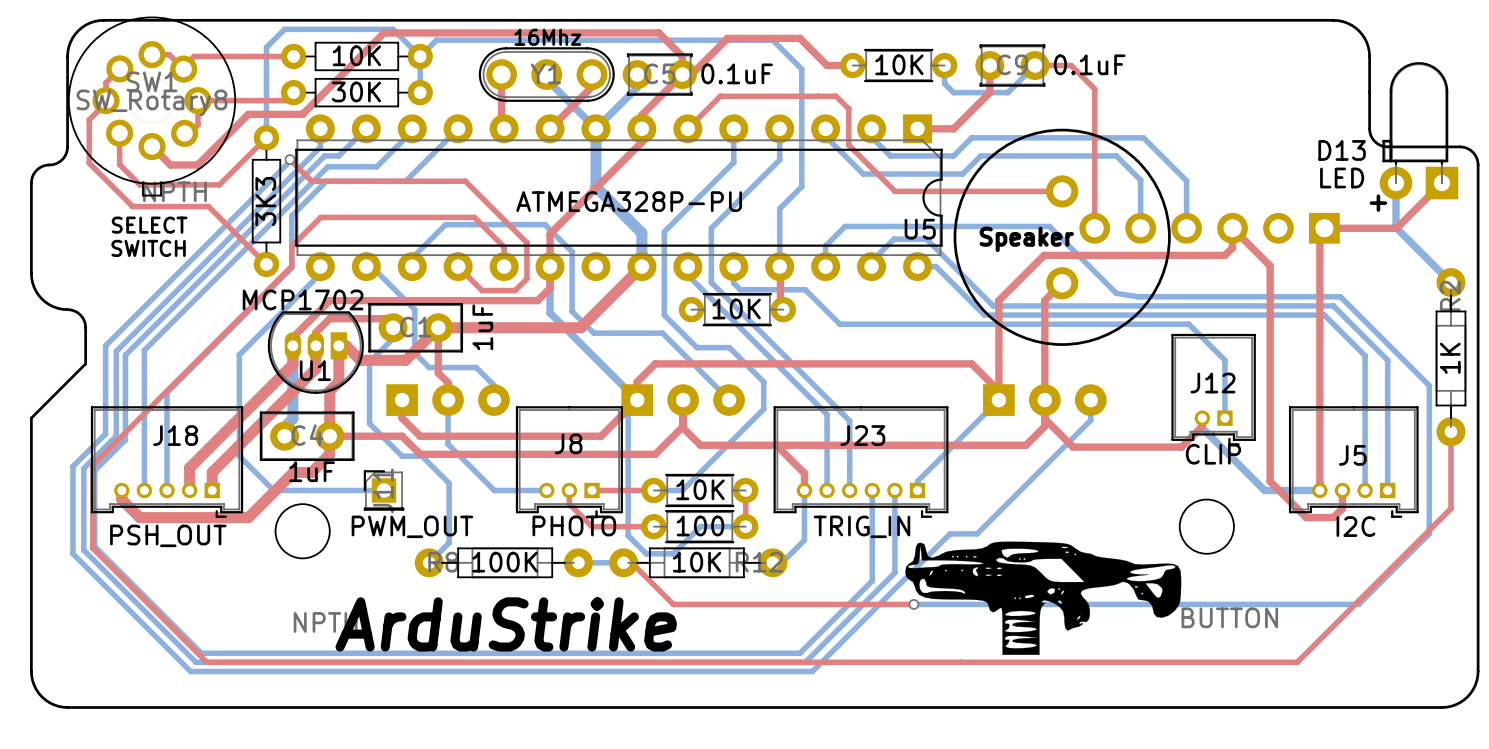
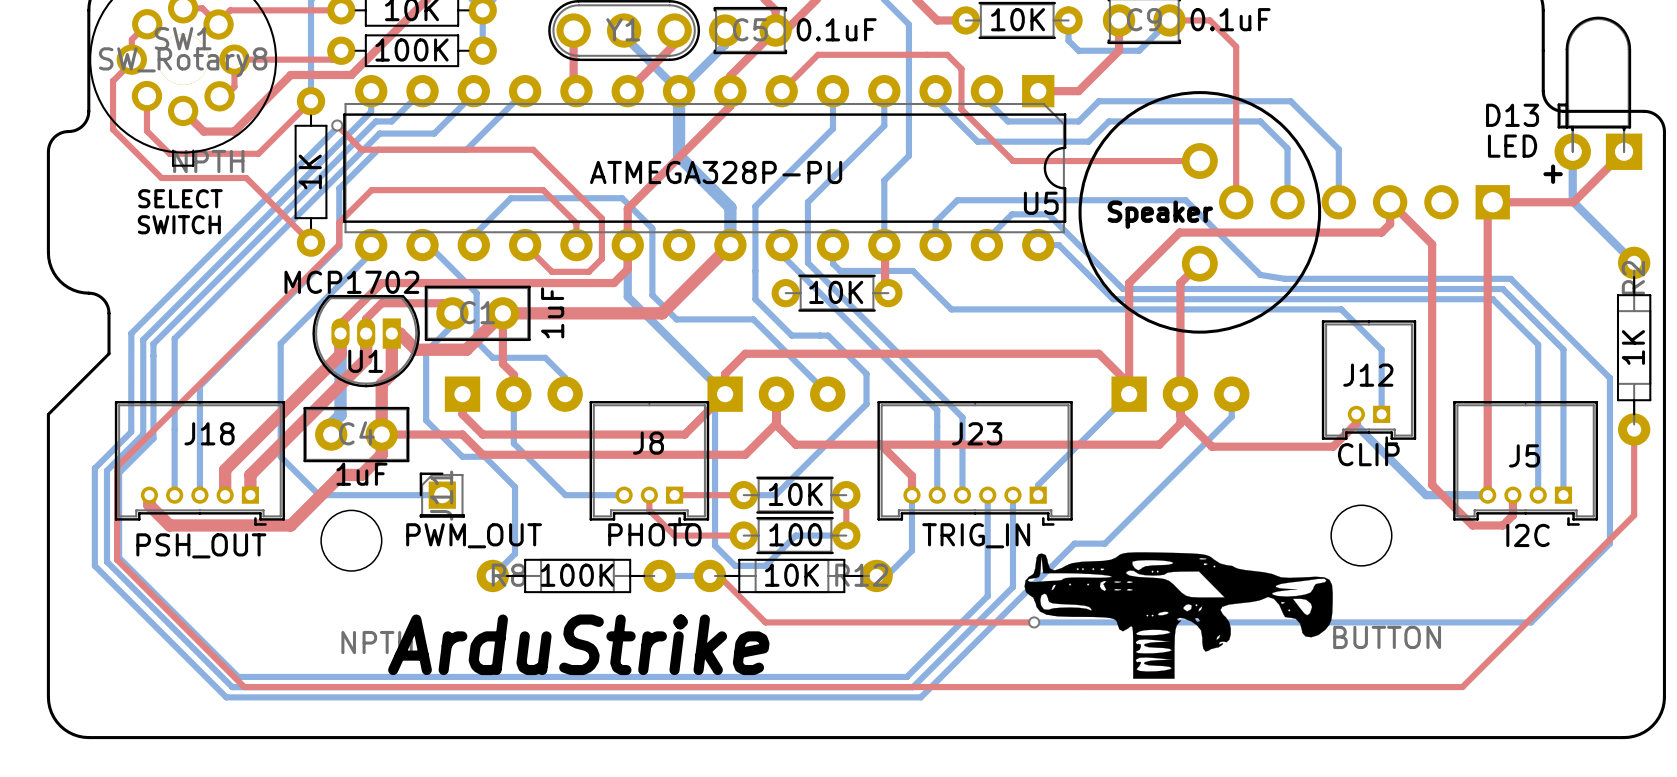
part value: 30K (356, 91) -> 100K (412, 49)
part value: 3K3 (265, 201) -> 1K (310, 171)

